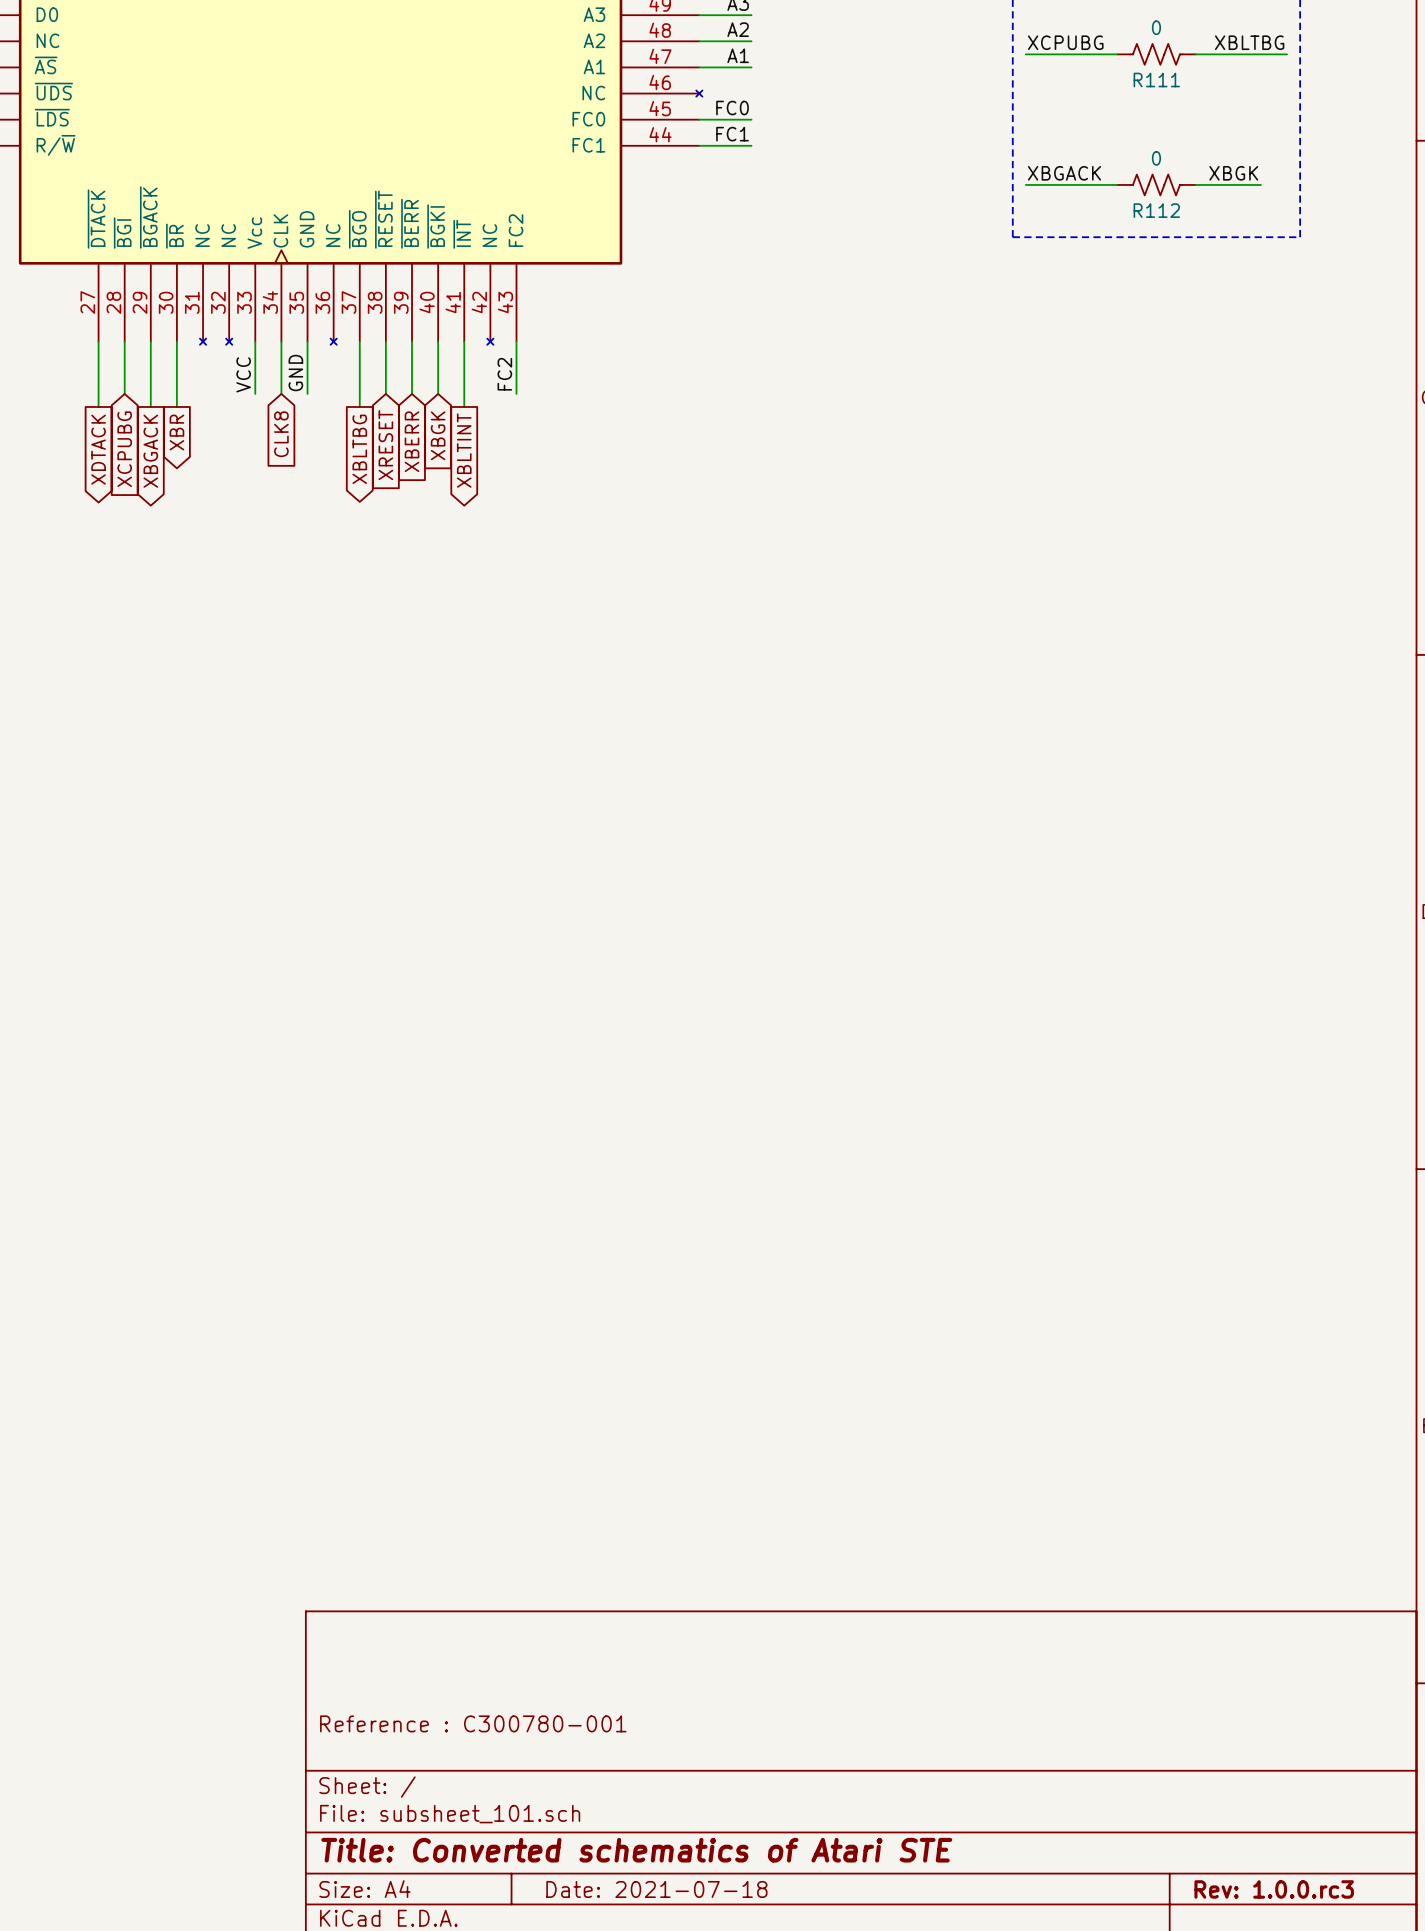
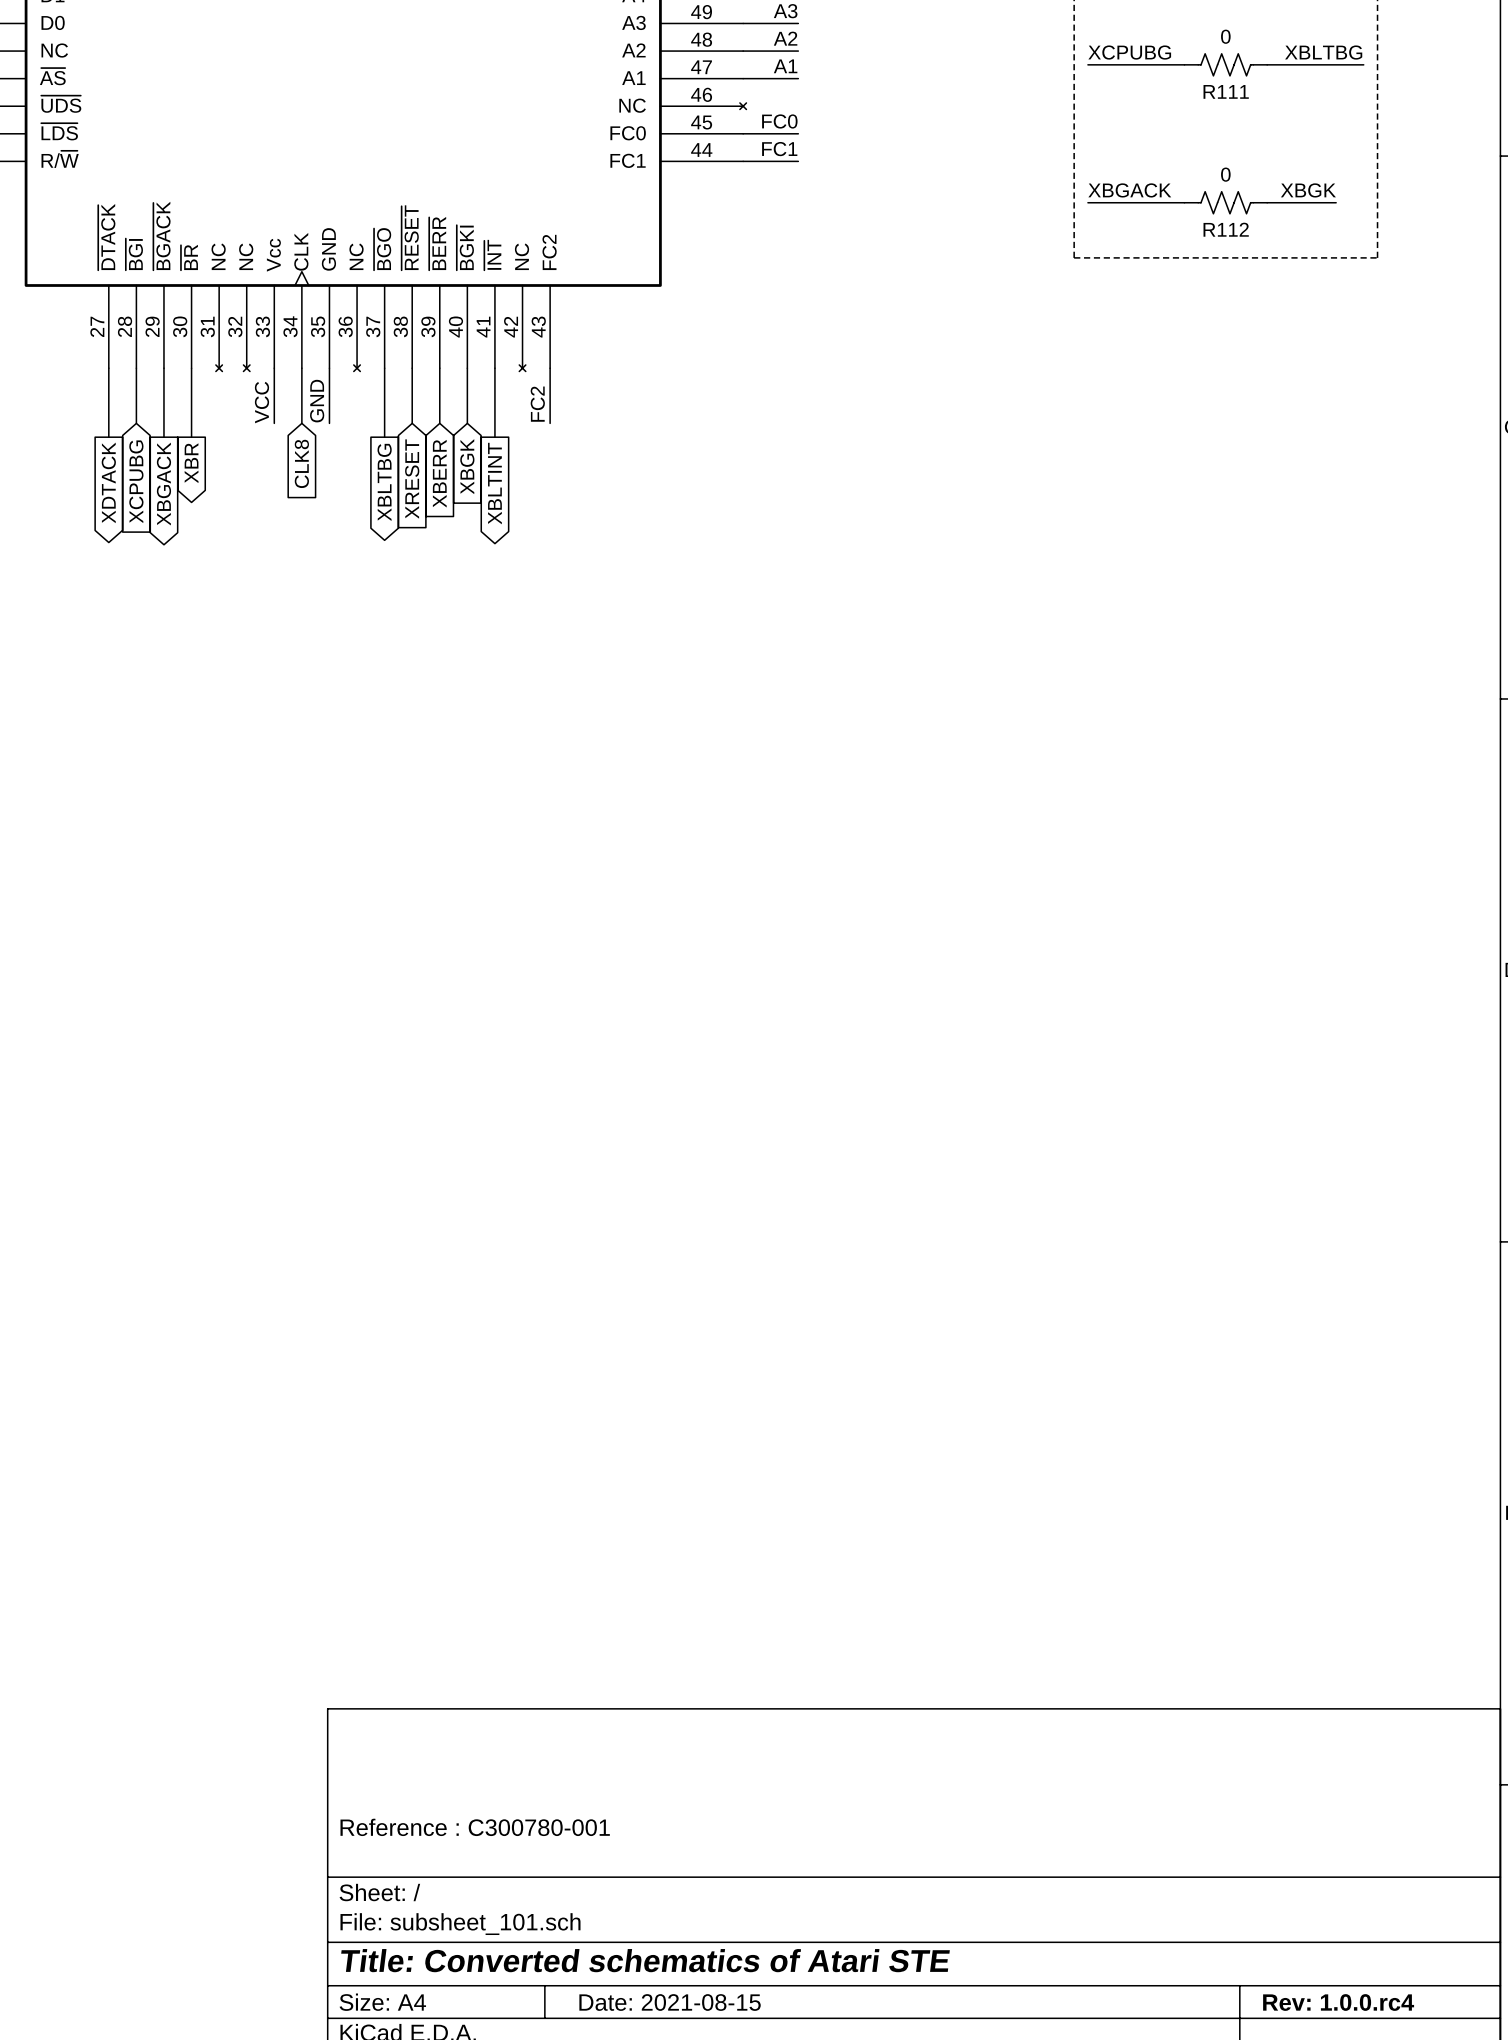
title block: Date: 2021-07-18 (656, 1889) -> Date: 2021-08-15 (670, 2002)
title block: Rev: 1.0.0.rc3 (1274, 1889) -> Rev: 1.0.0.rc4 (1338, 2002)

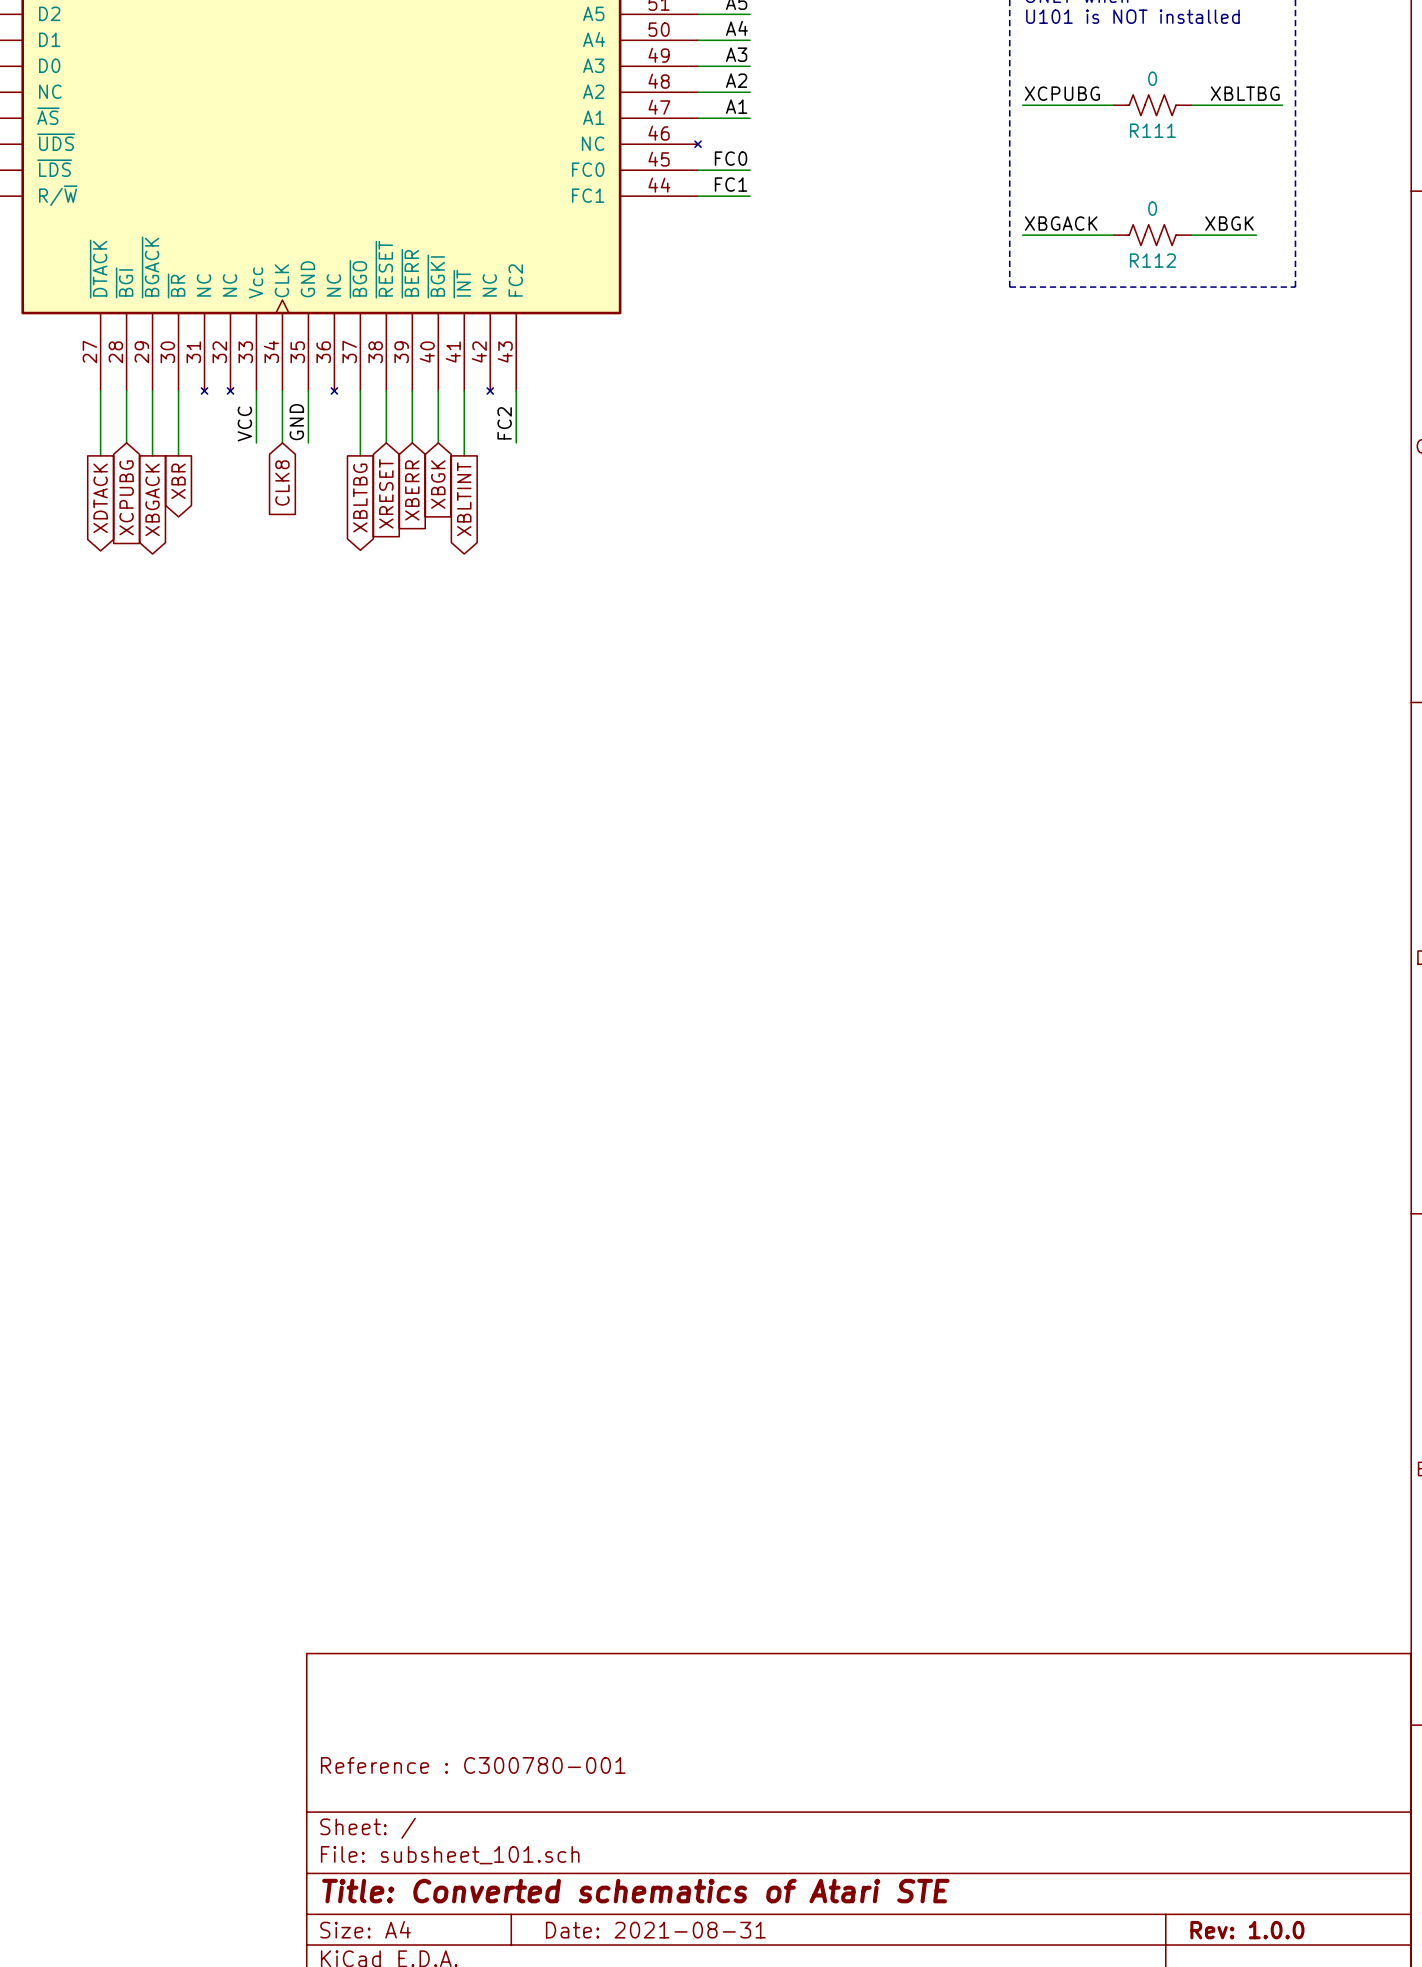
title block: Date: 2021-08-15 (670, 2002) -> Date: 2021-08-31 (655, 1930)
title block: Rev: 1.0.0.rc4 (1338, 2002) -> Rev: 1.0.0 (1247, 1930)

